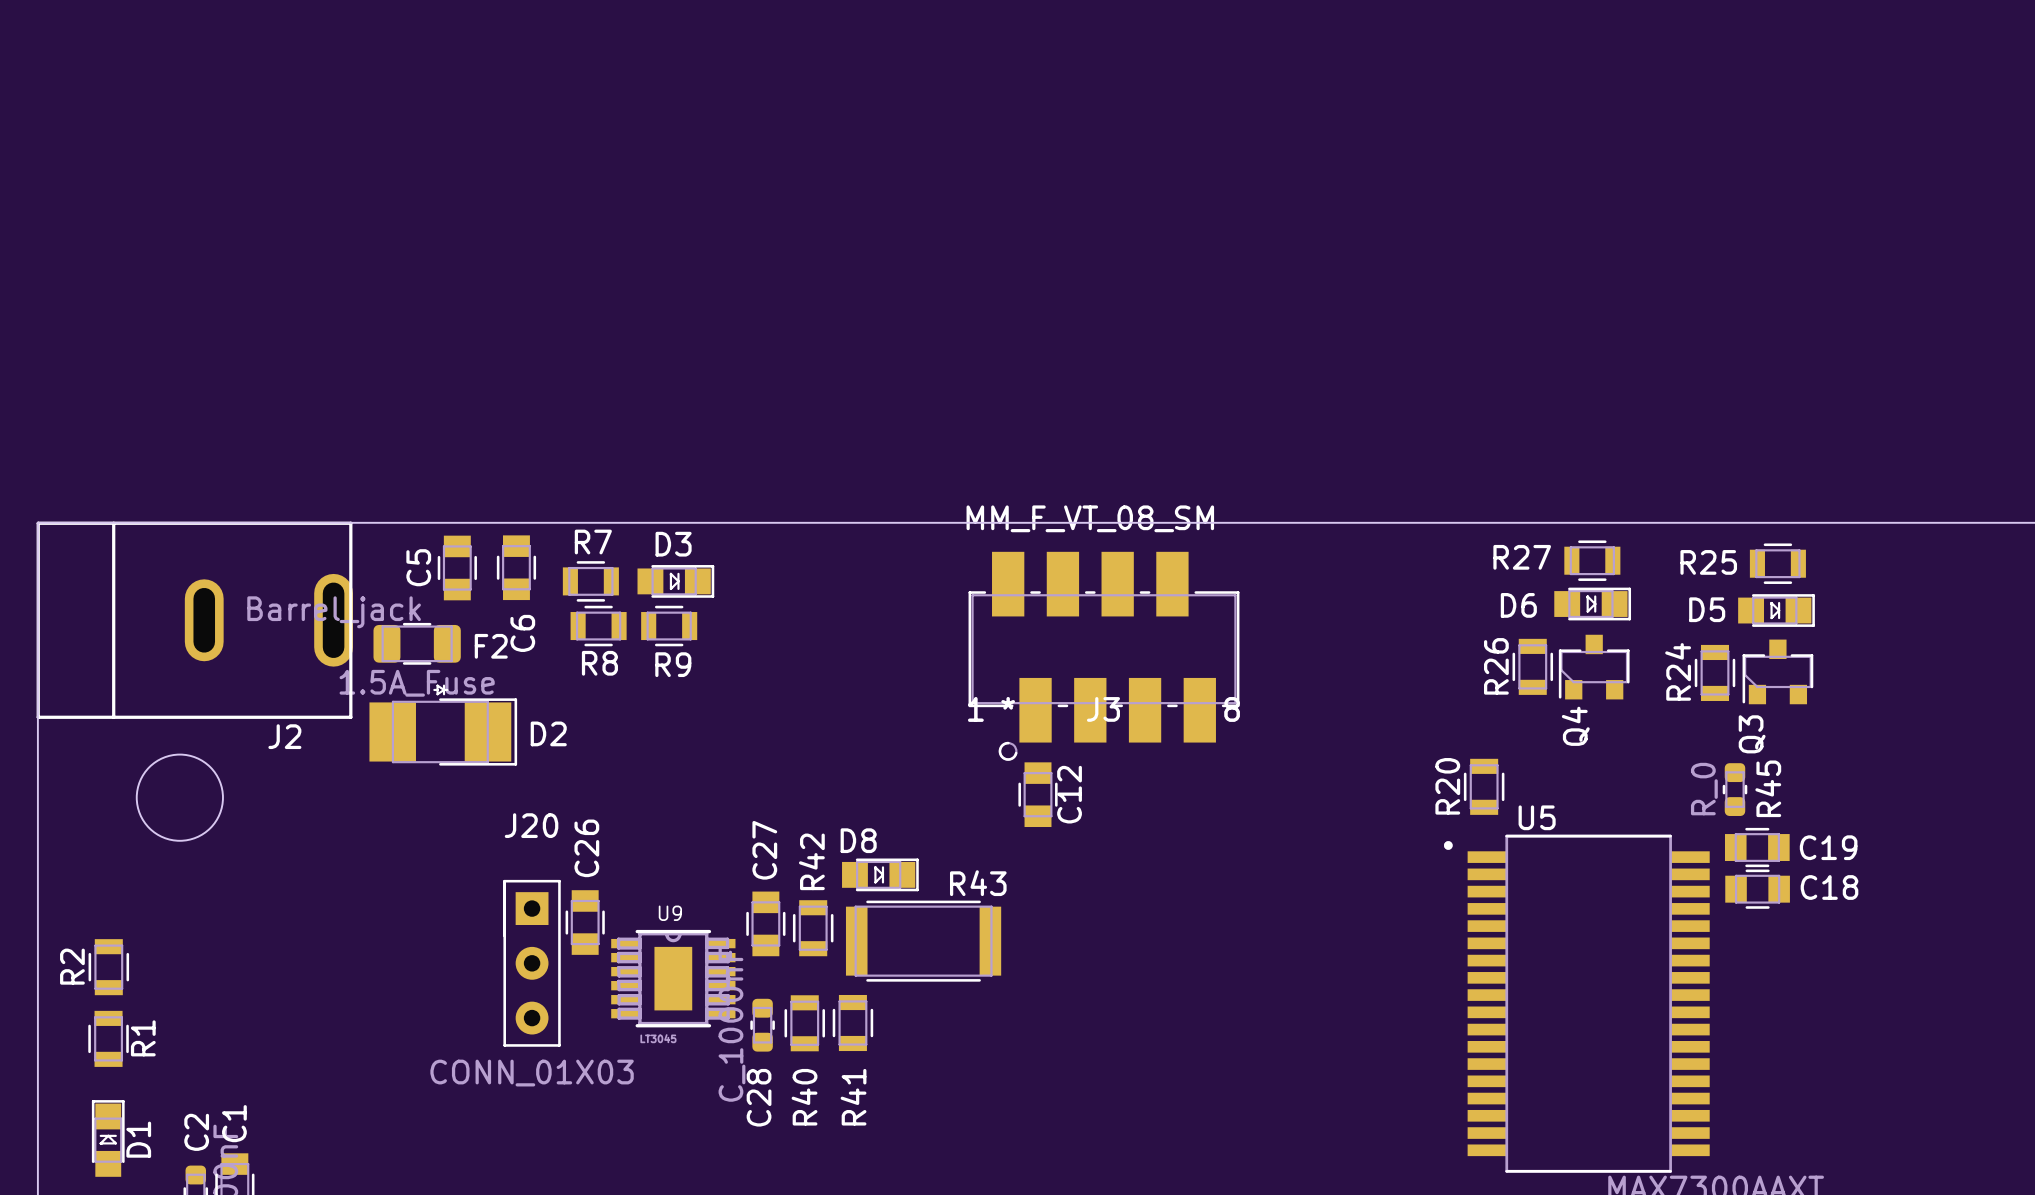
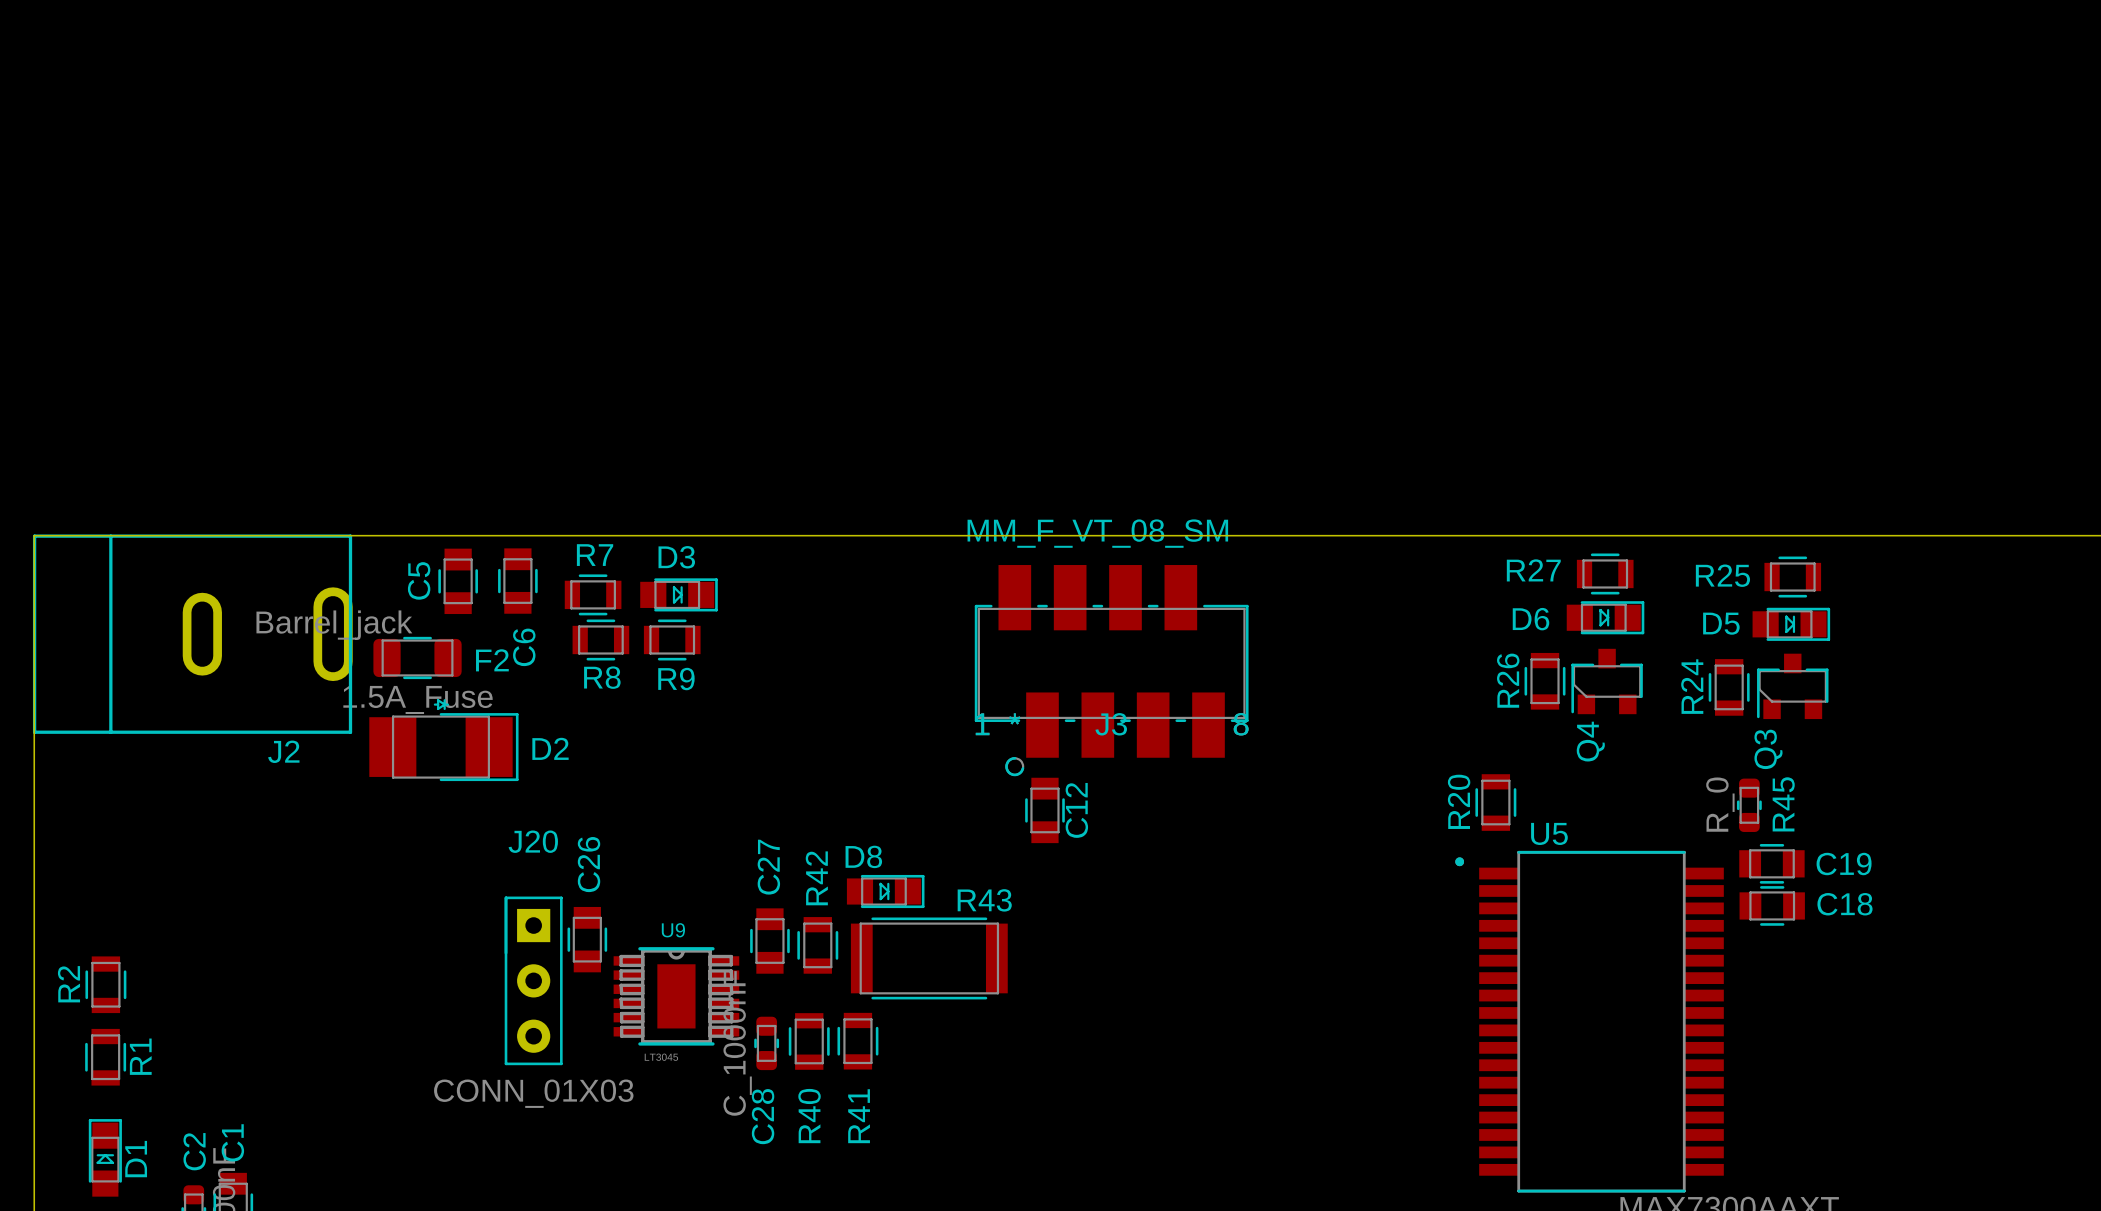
round board edge: [136, 754, 224, 842] -> none

